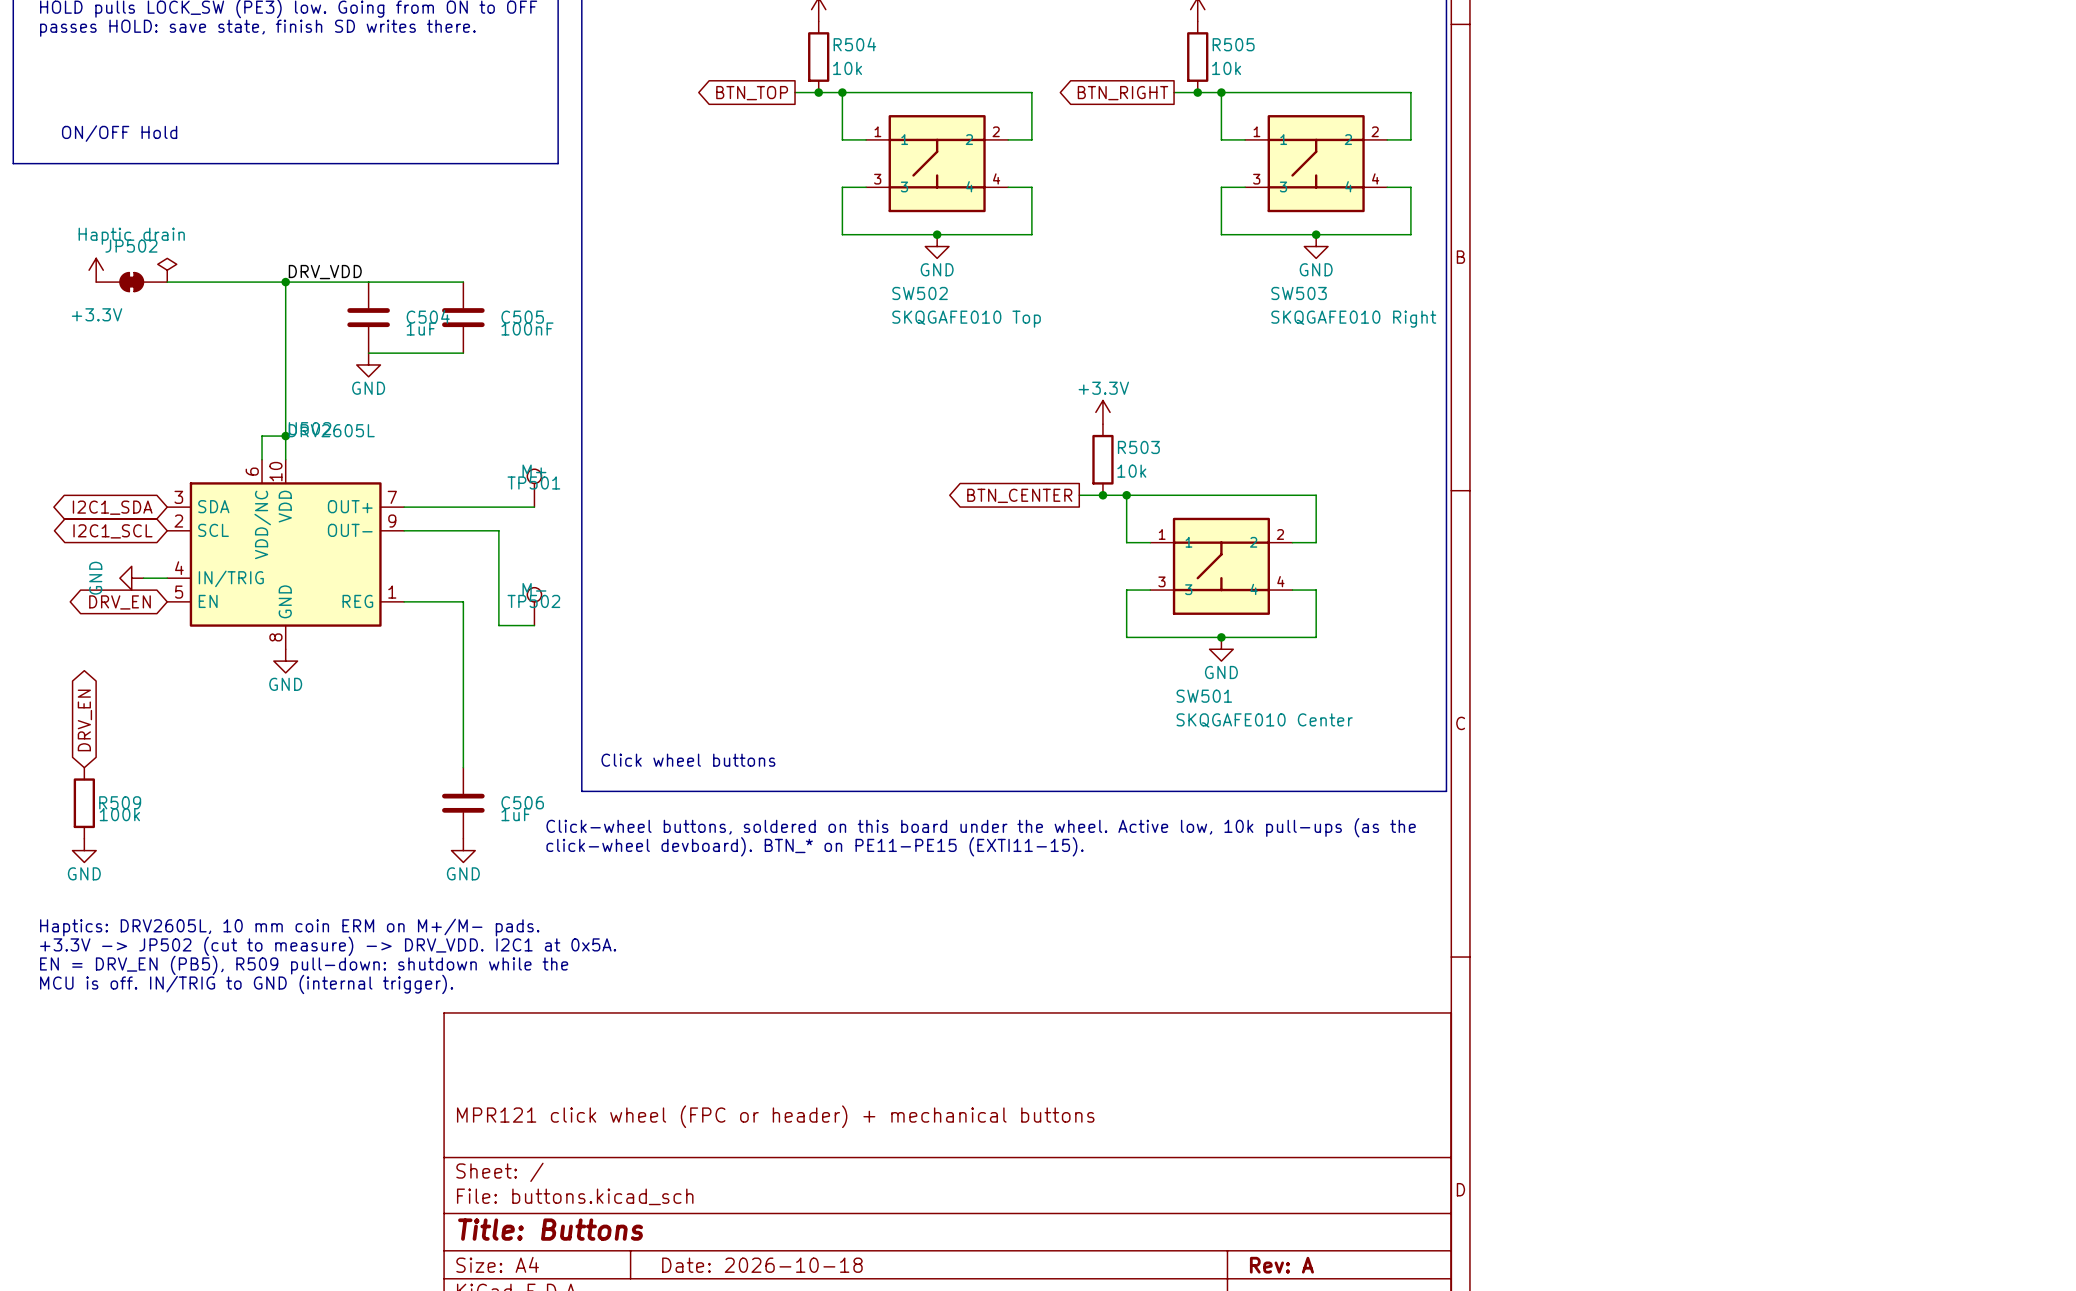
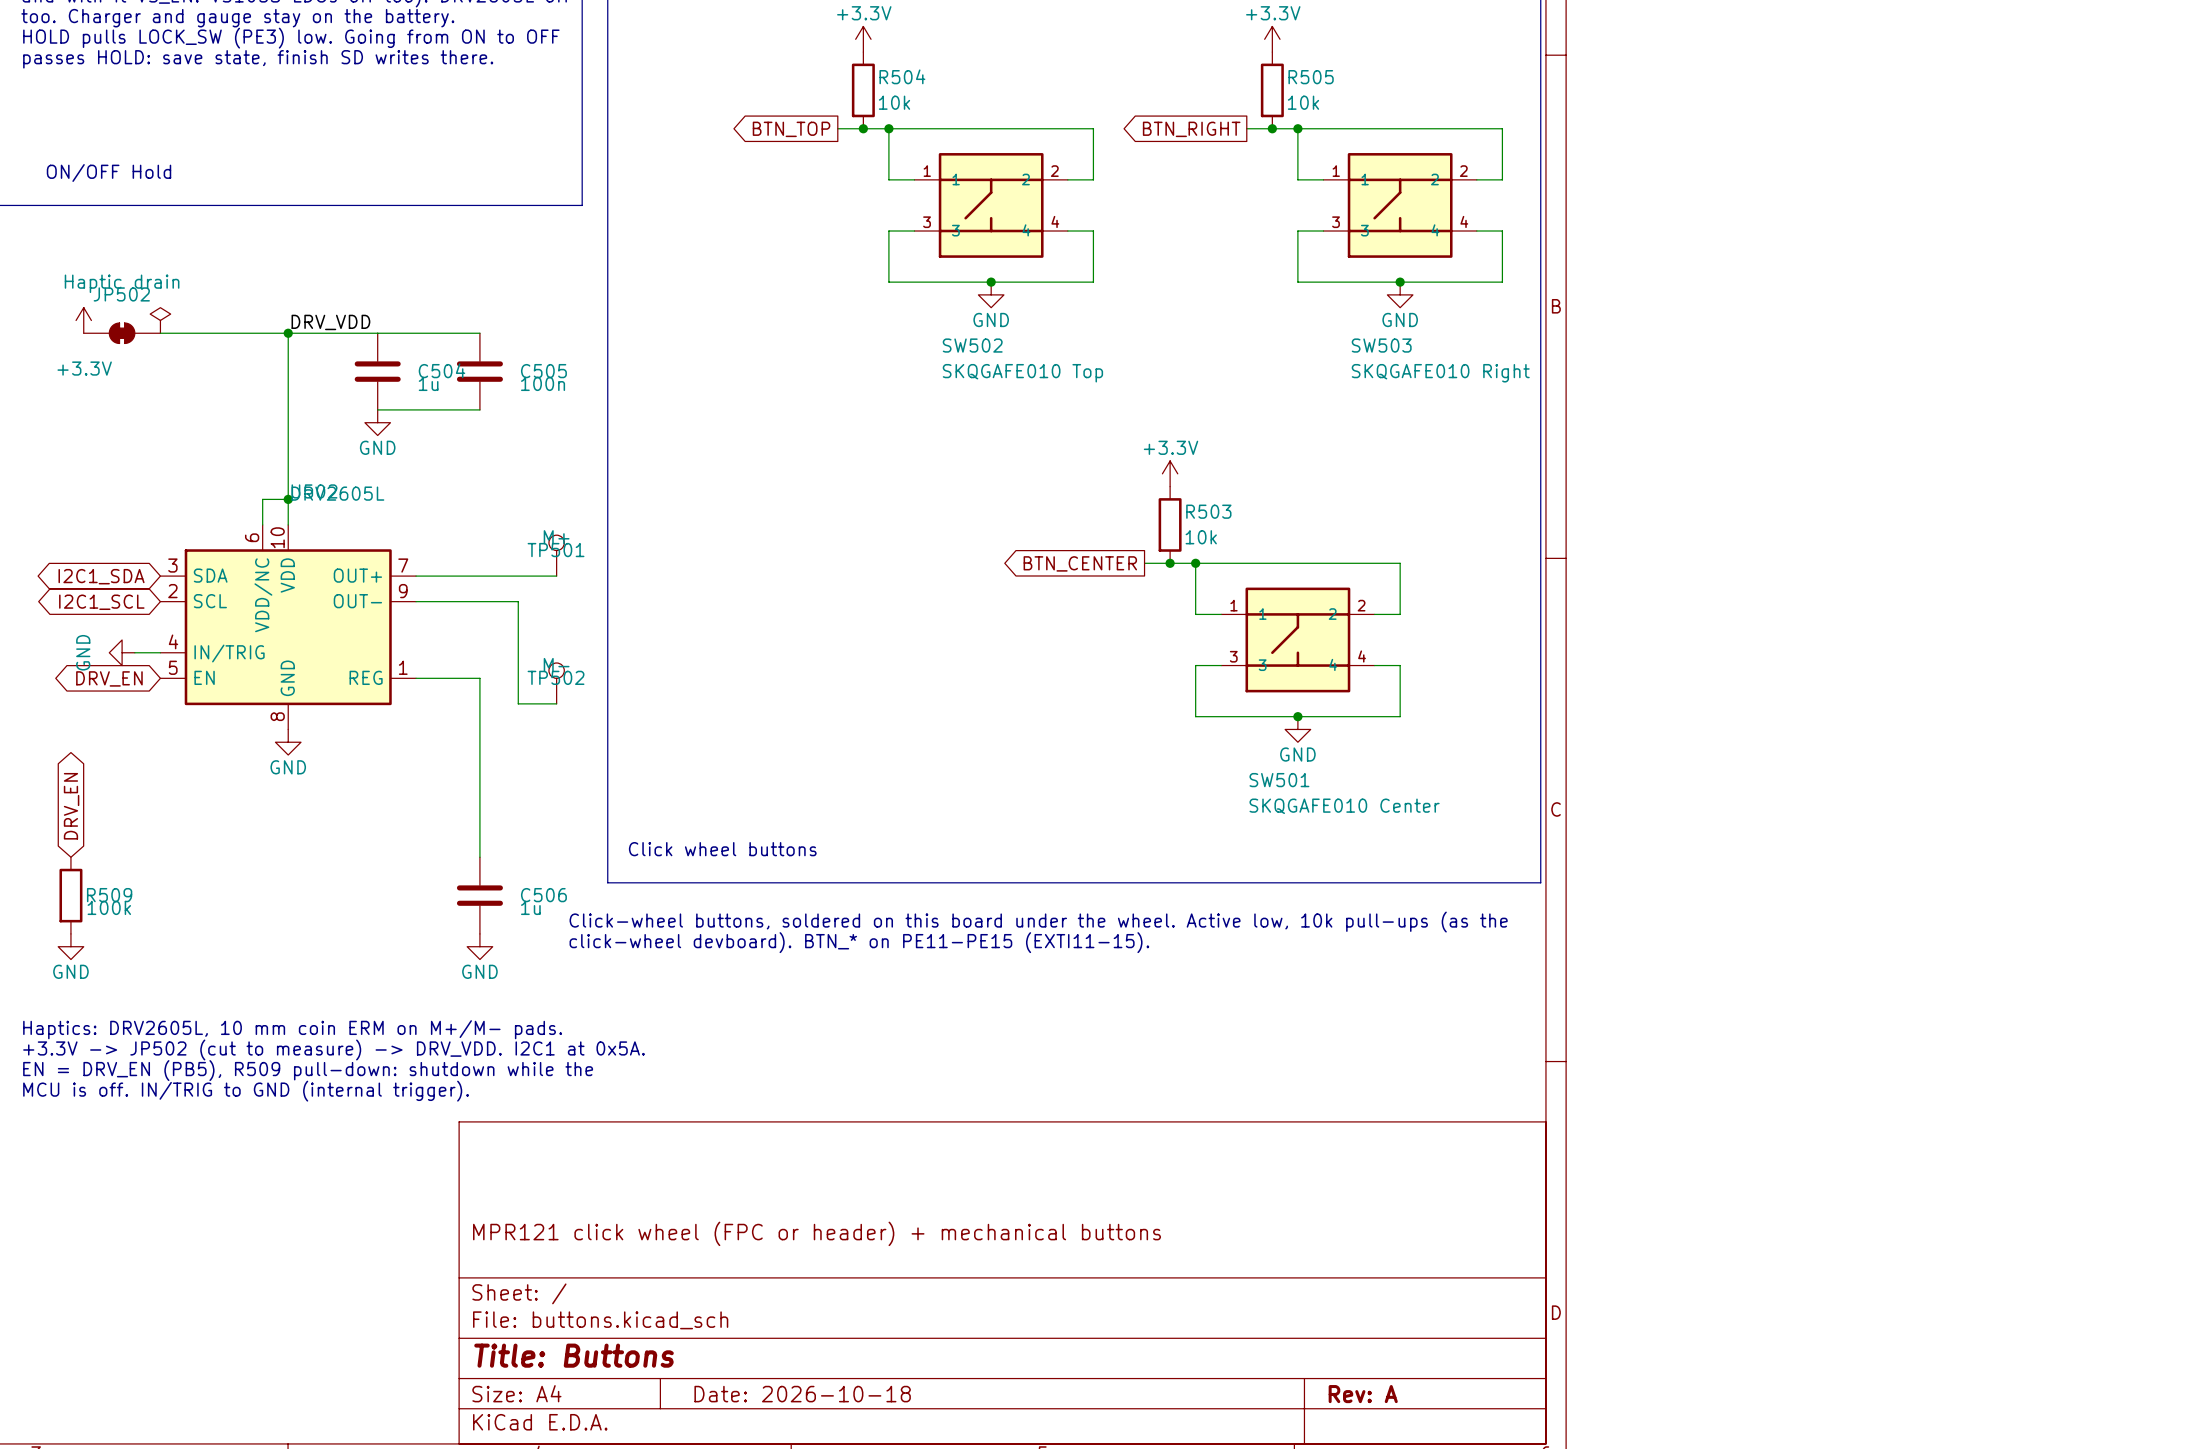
C504 value: 1uF (421, 329) -> 1u (428, 383)
C505 value: 100nF (527, 329) -> 100n (543, 383)
C506 value: 1uF (516, 814) -> 1u (530, 907)

